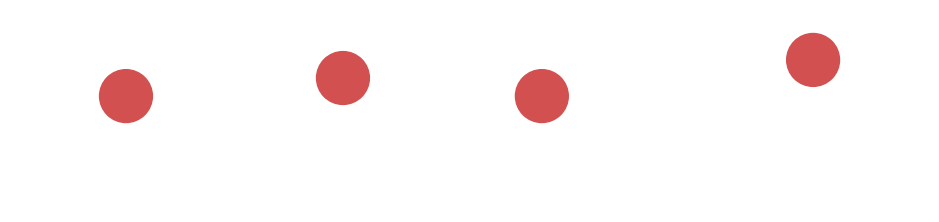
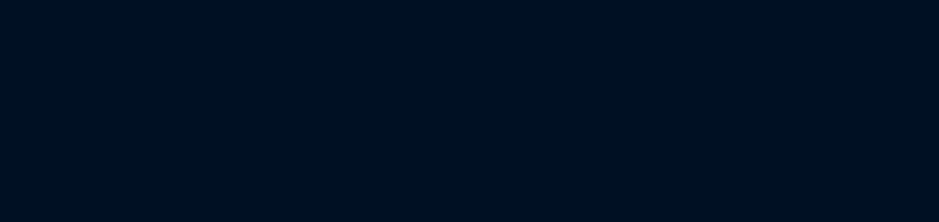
part: (813, 59) -> none
part: (342, 78) -> none
part: (125, 96) -> none
part: (541, 96) -> none

